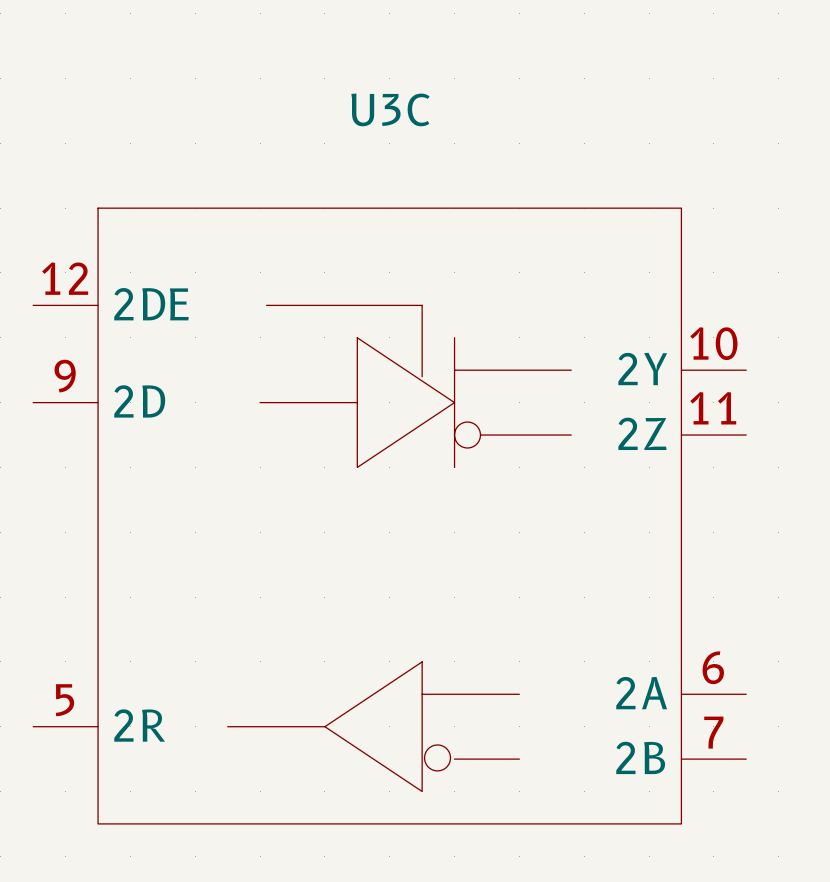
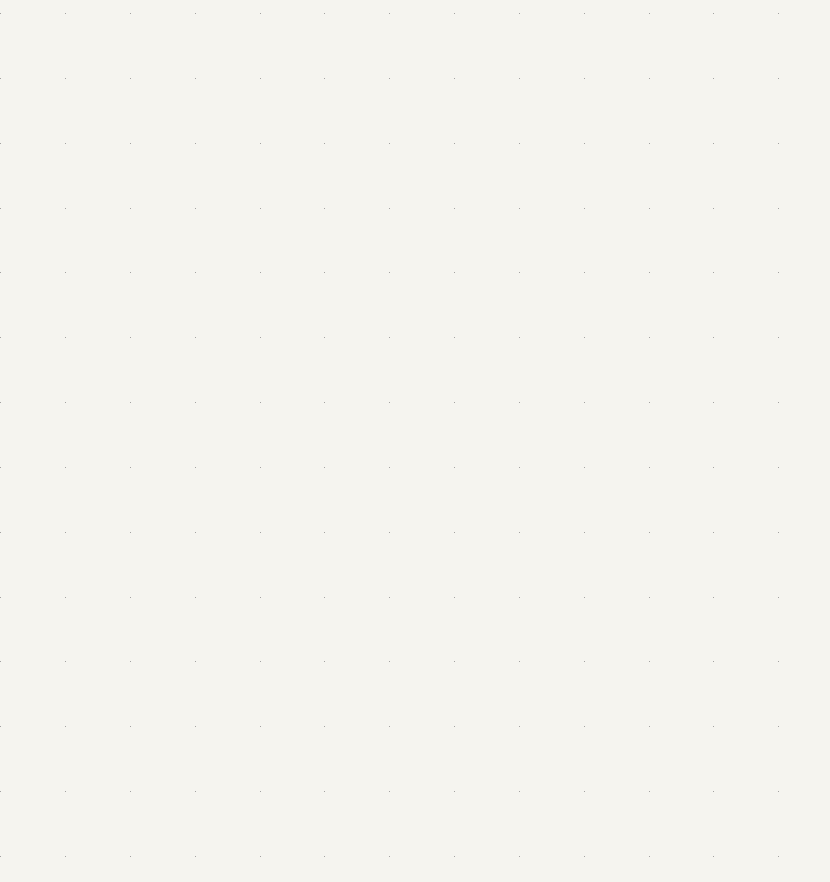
U3C: (389, 516) -> none

